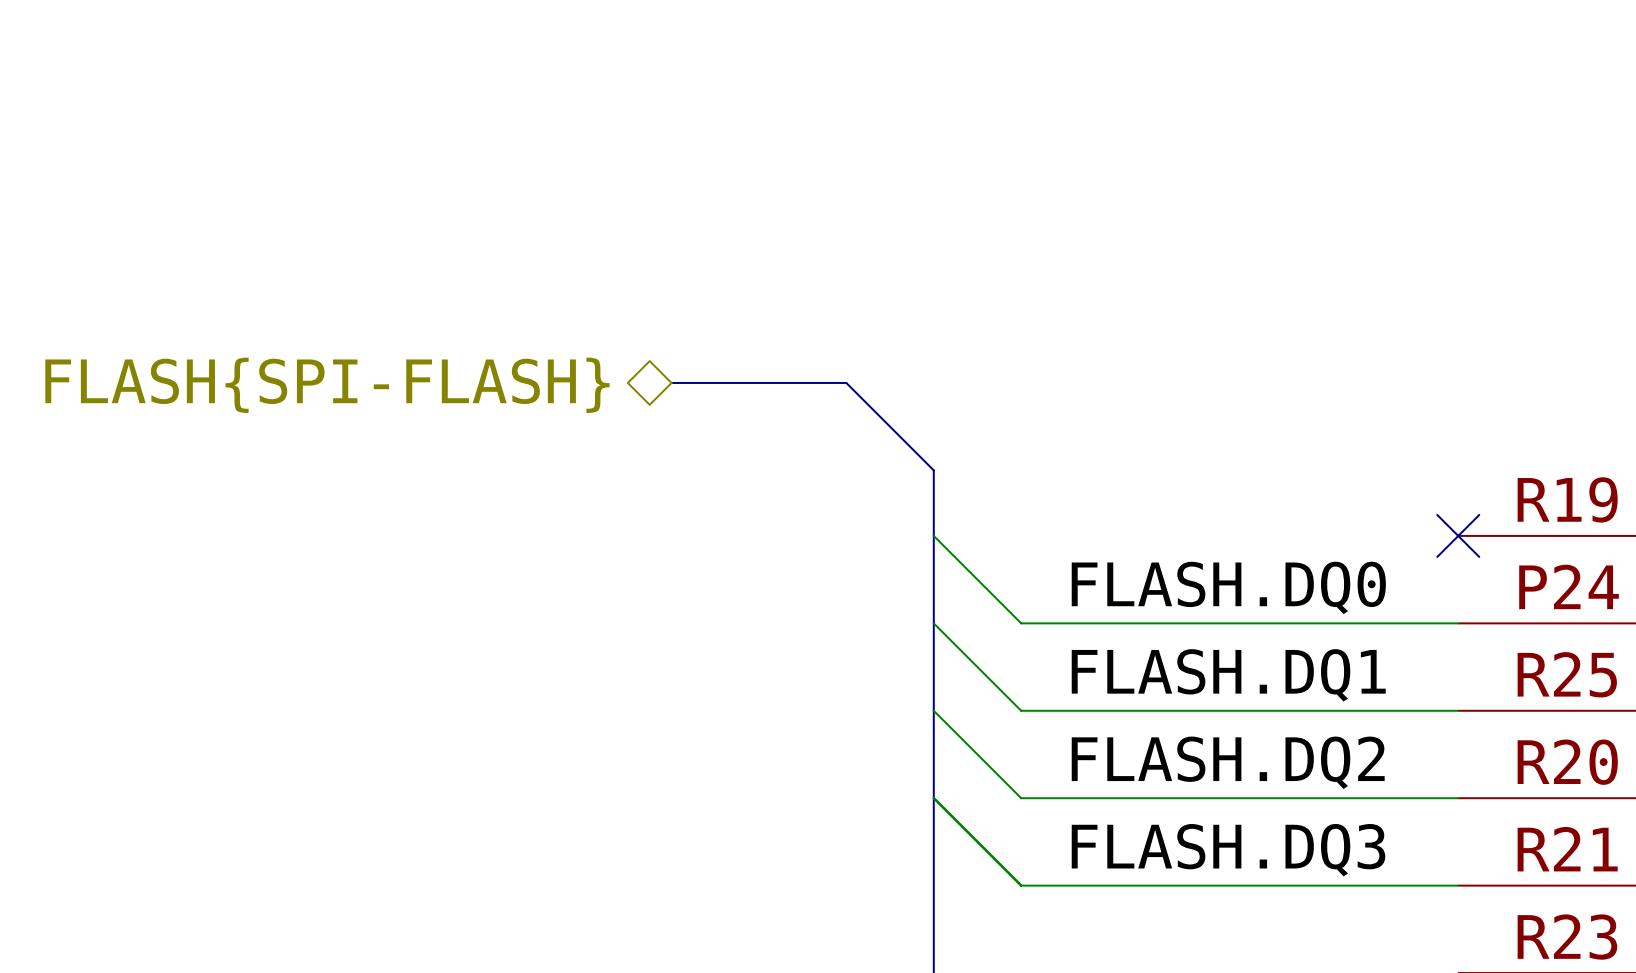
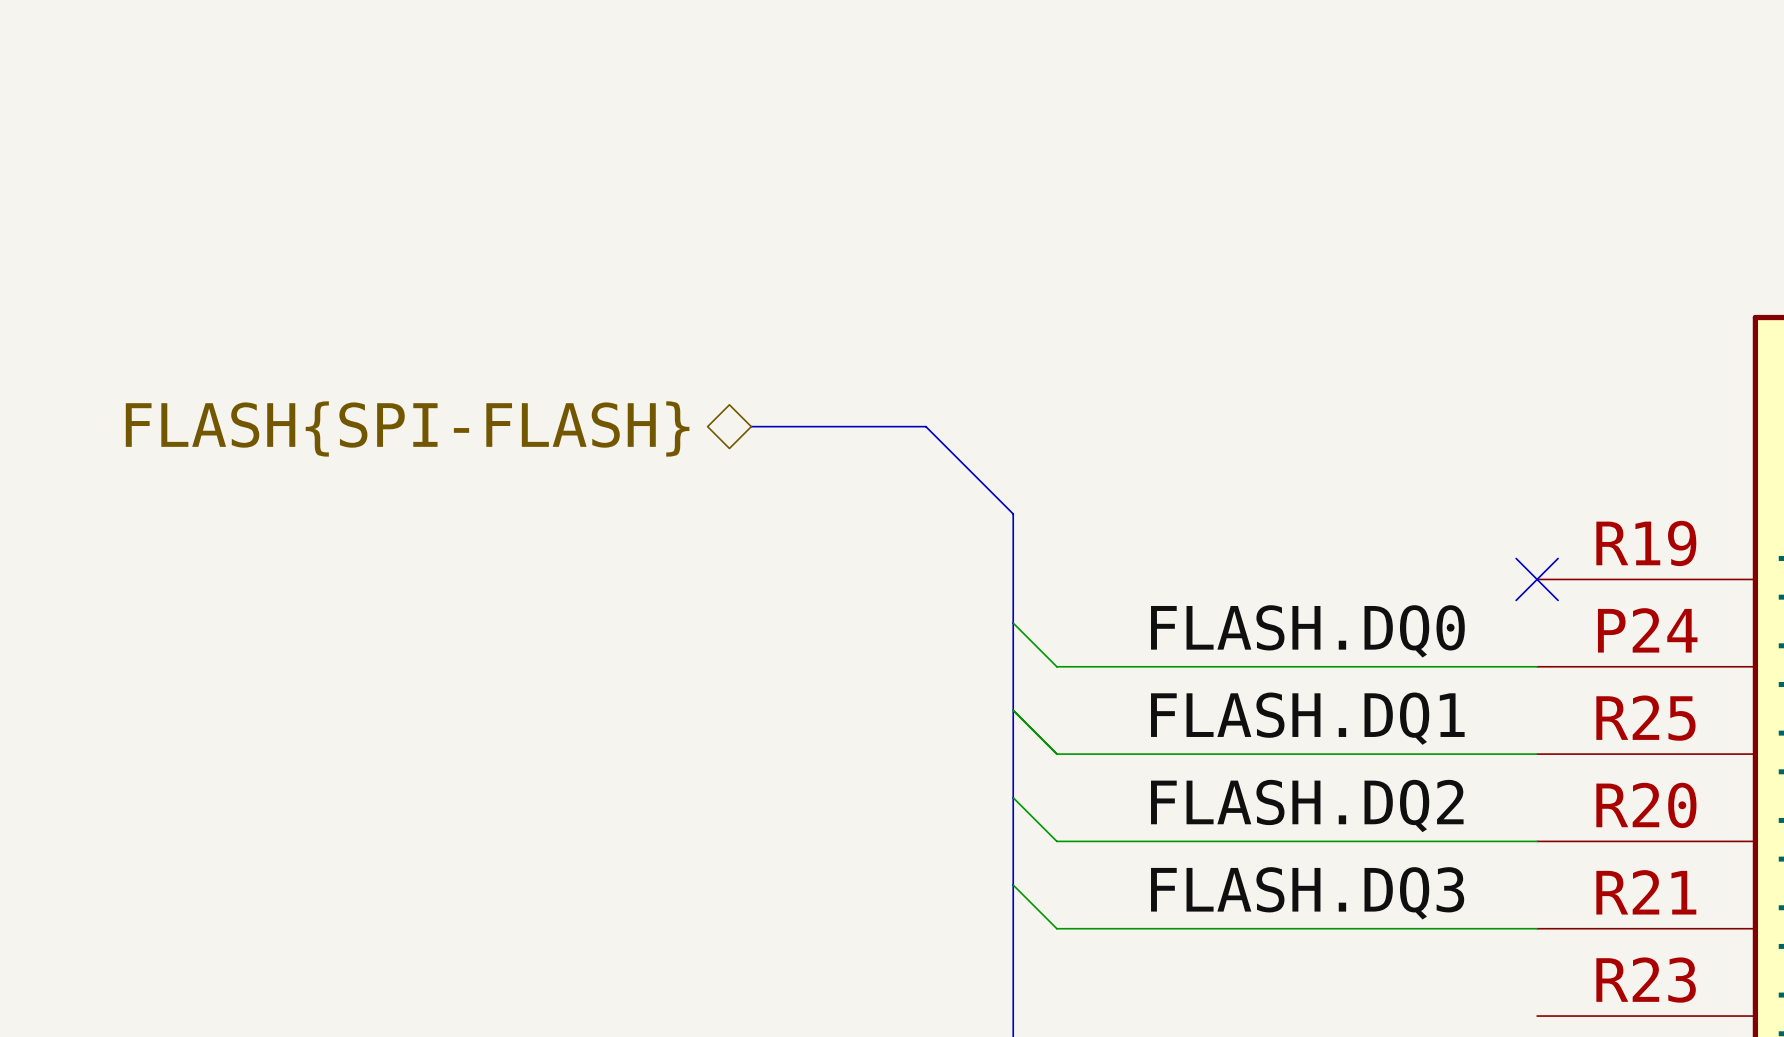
wire: (933, 535) (1021, 623) -> (1013, 623) (1056, 666) (1100, 666)
wire: (933, 623) (1021, 710) -> (1013, 710) (1056, 754) (1100, 754)
wire: (933, 710) (1021, 798) -> (1013, 797) (1056, 841) (1100, 841)
wire: (933, 798) (1021, 885) -> (1013, 885) (1056, 928) (1100, 928)

